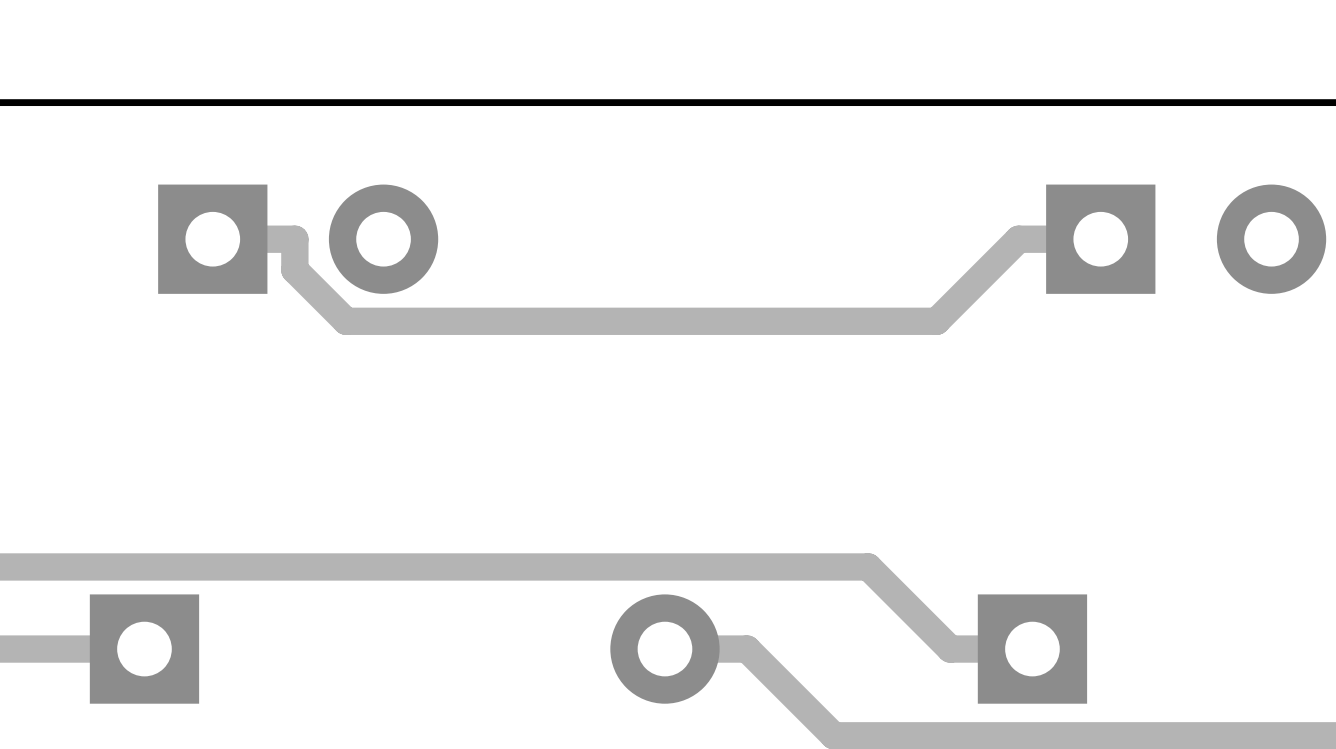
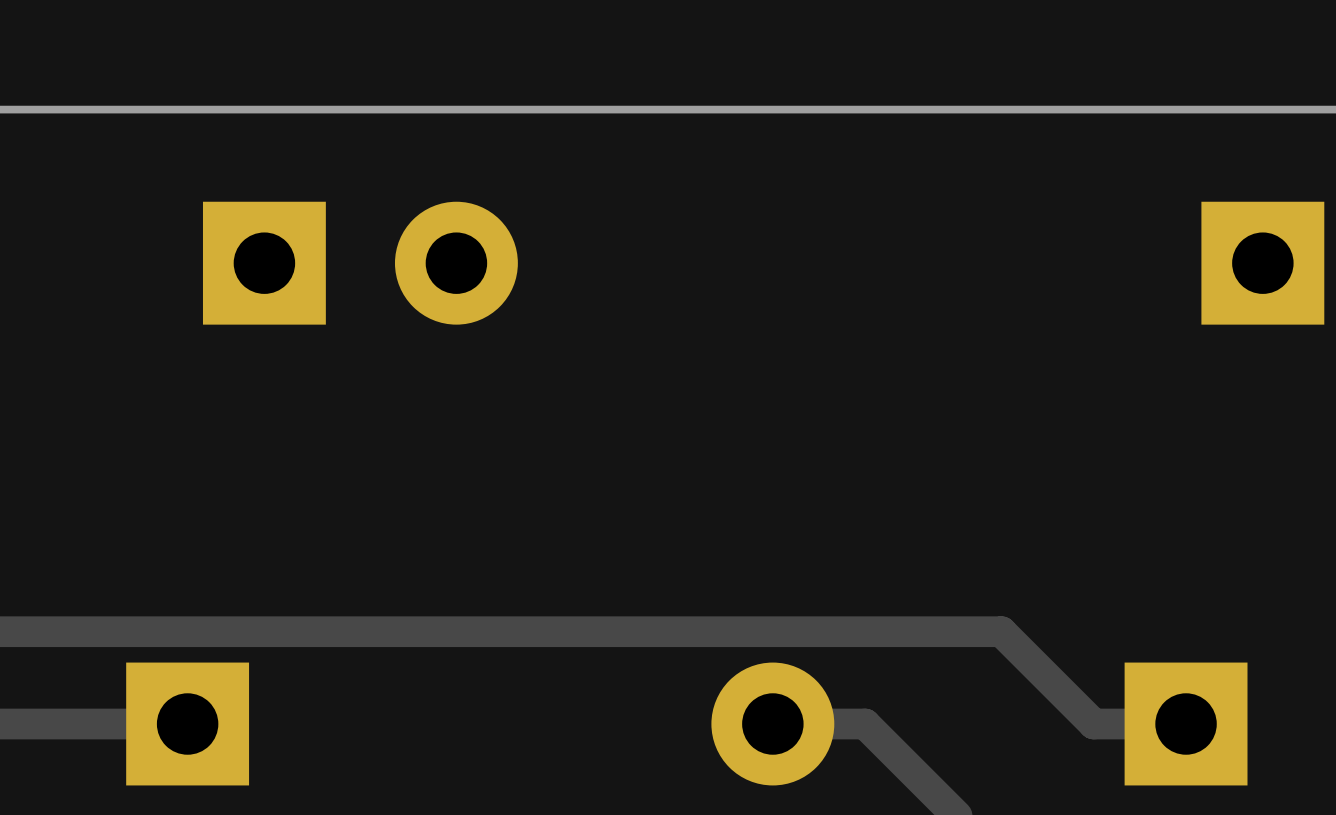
track: (212, 239) (294, 239) (294, 270) (346, 321) (936, 321) (1018, 239) (1100, 239) -> none

